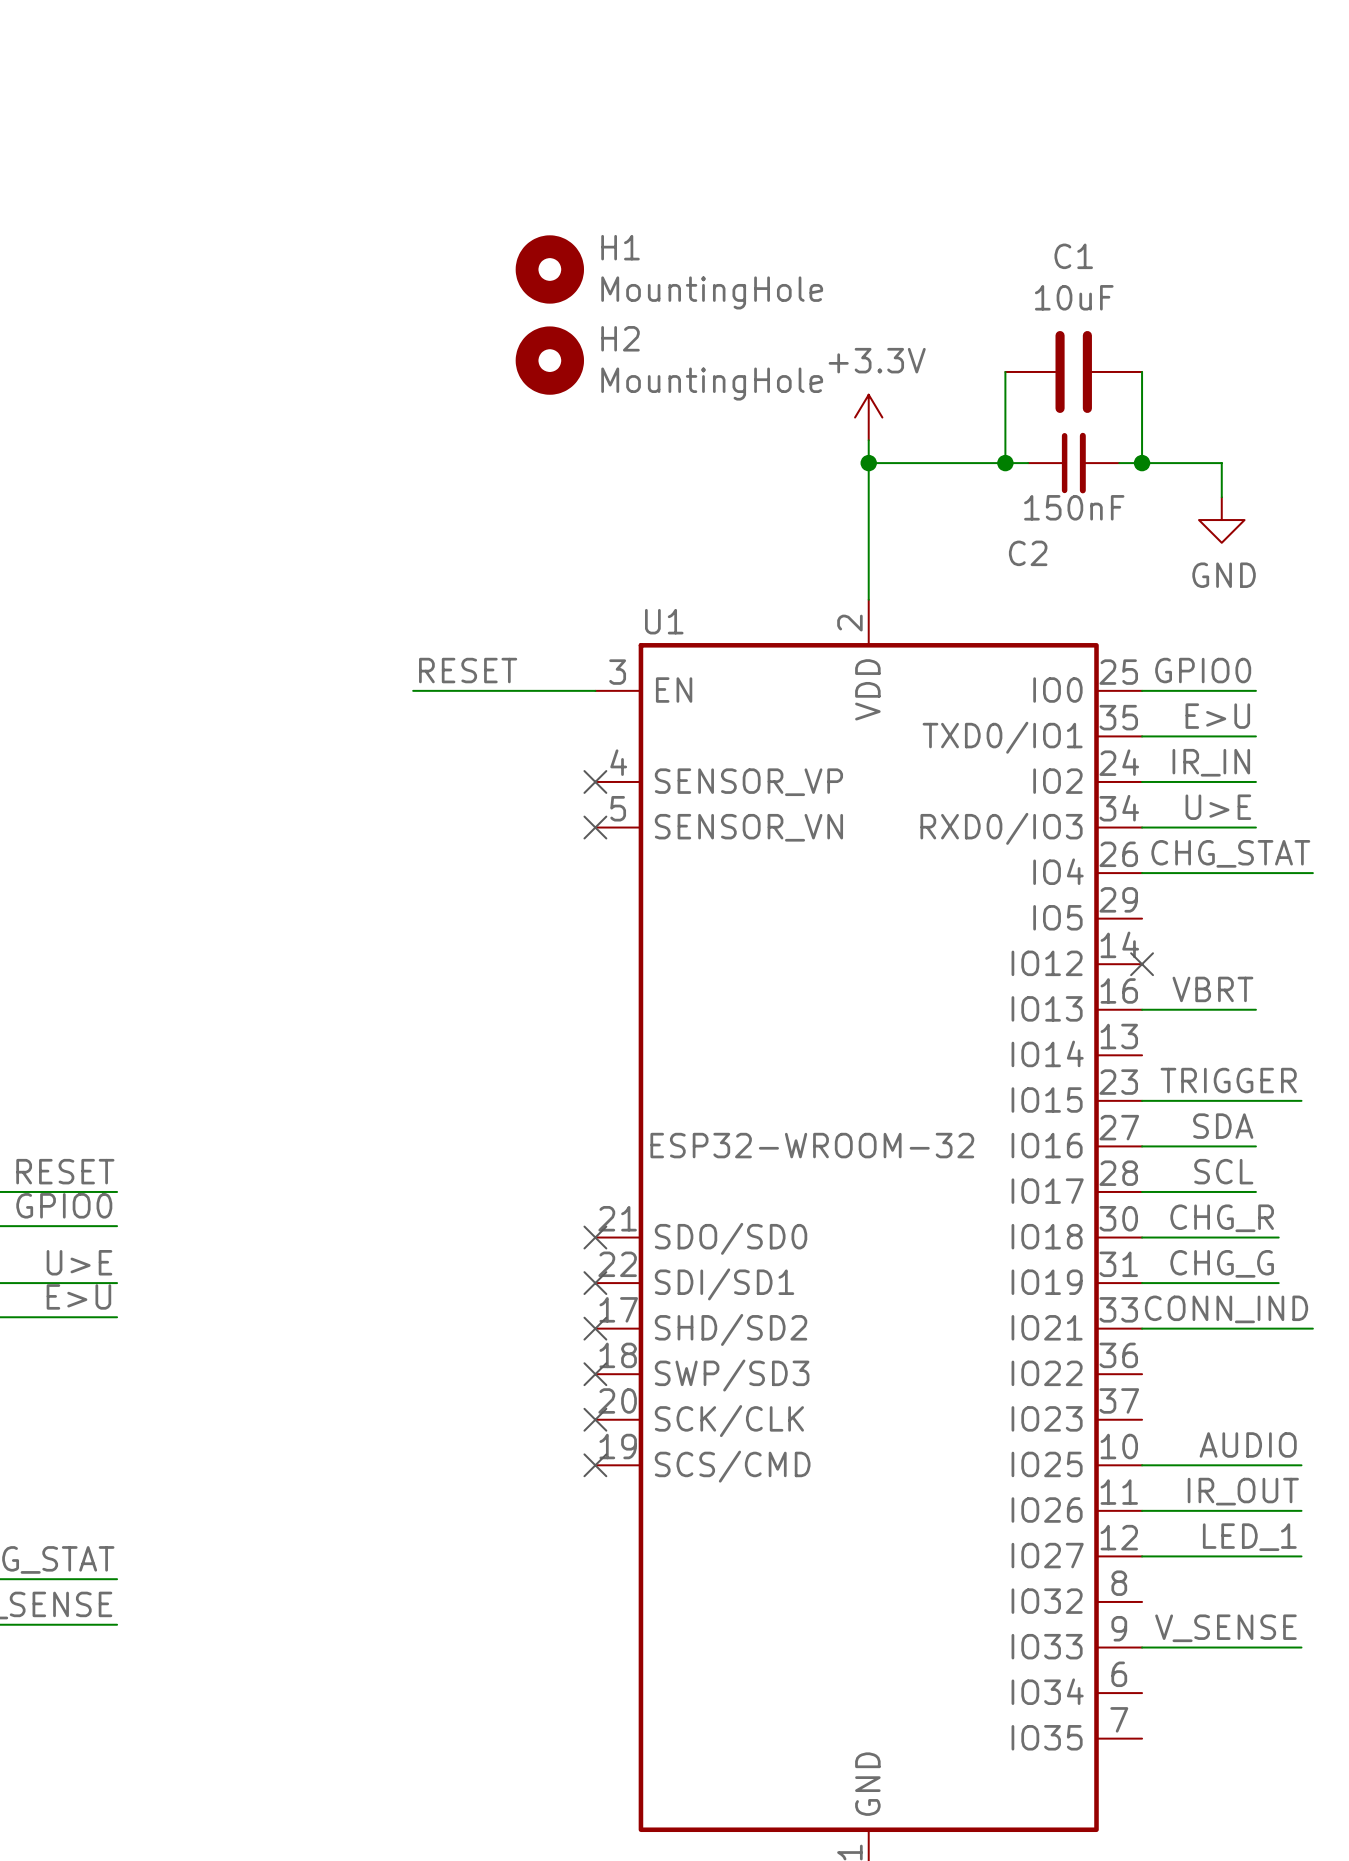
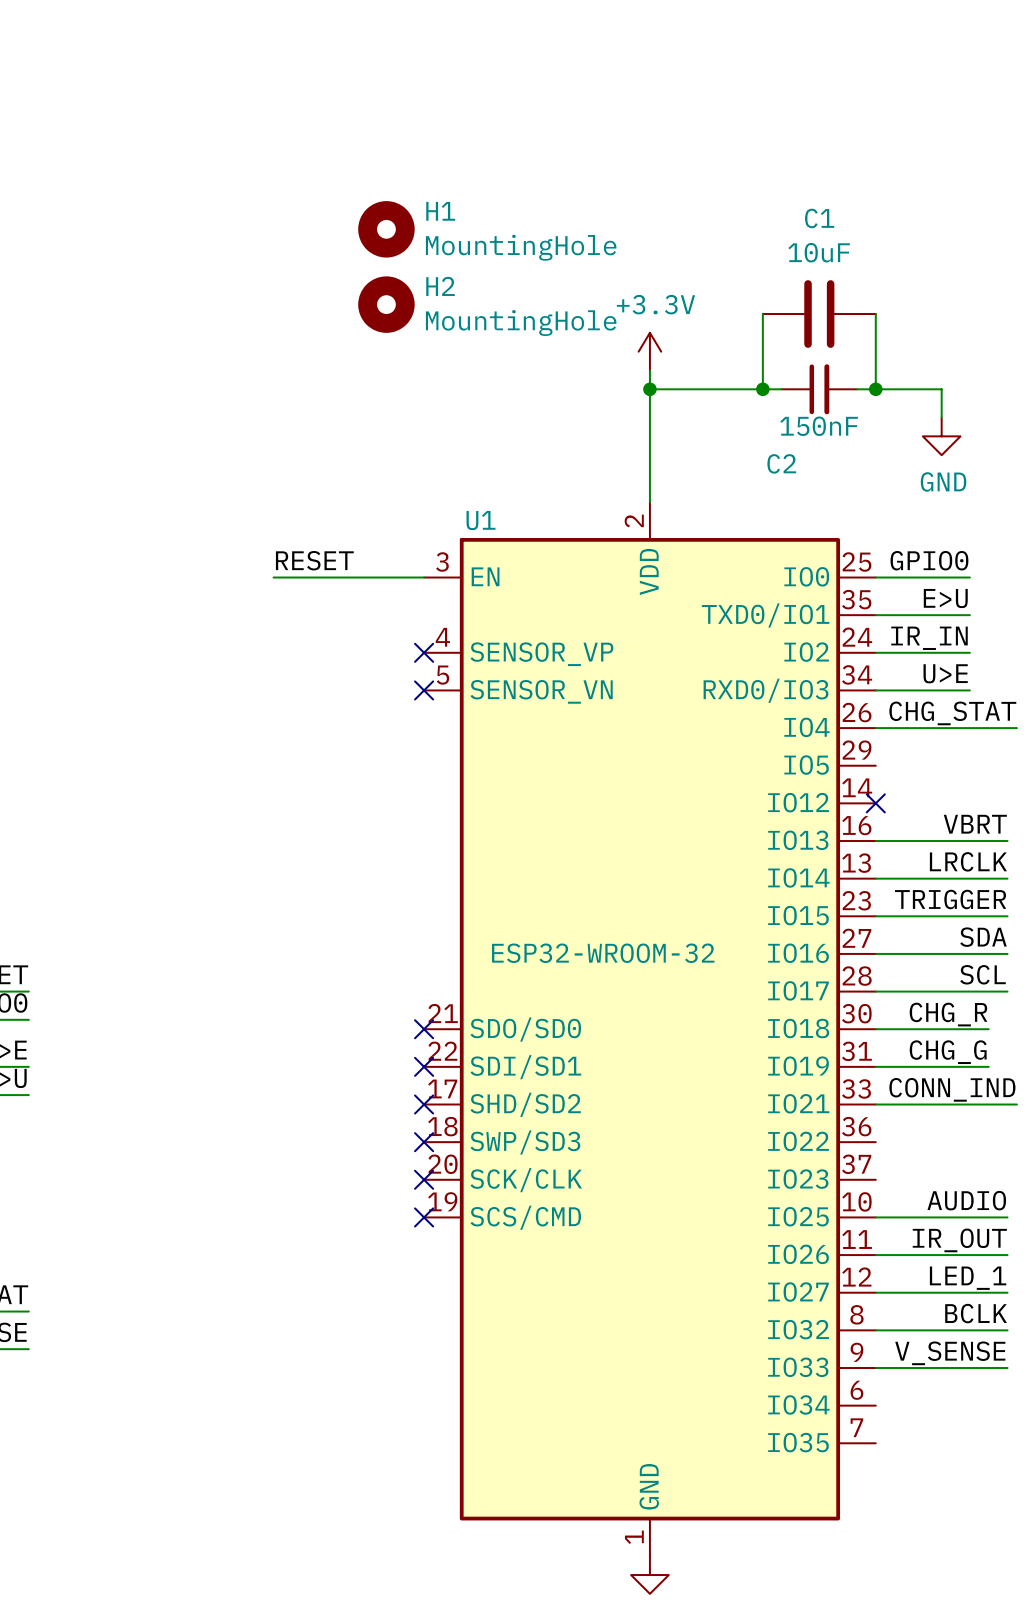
label position: VBRT (1212, 989) -> VBRT (975, 824)
wire: none -> (969, 841) (1007, 841)
label: none -> LRCLK (968, 861)
wire: none -> (875, 878) (1007, 878)
label position: SDA (1223, 1126) -> SDA (983, 937)
wire: none -> (969, 953) (1007, 953)
label position: SCL (1223, 1171) -> SCL (983, 974)
wire: none -> (969, 991) (1007, 991)
label: none -> BCLK (976, 1313)
wire: none -> (875, 1330) (1007, 1330)

